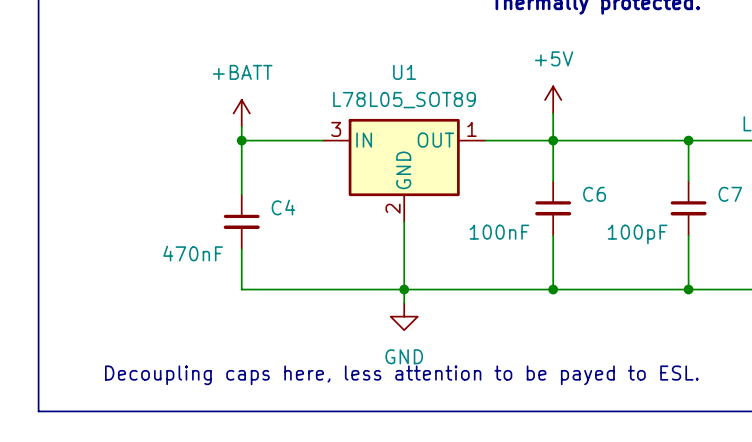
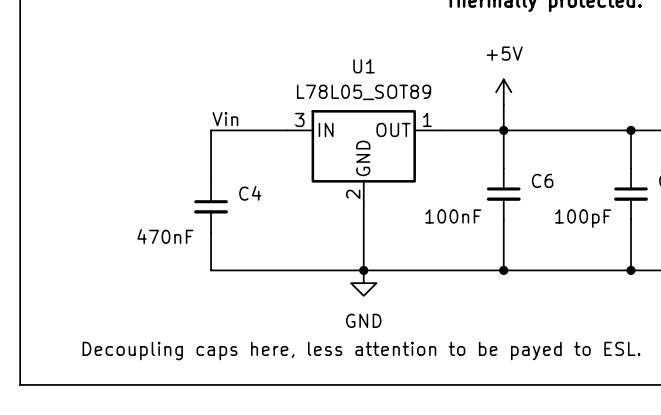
power symbol: +BATT (241, 113) -> none
wire: (241, 127) (241, 140) -> none
label: none -> Vin (225, 119)
junction: (241, 140) -> none
power symbol position: GND (404, 316) -> GND (363, 283)

